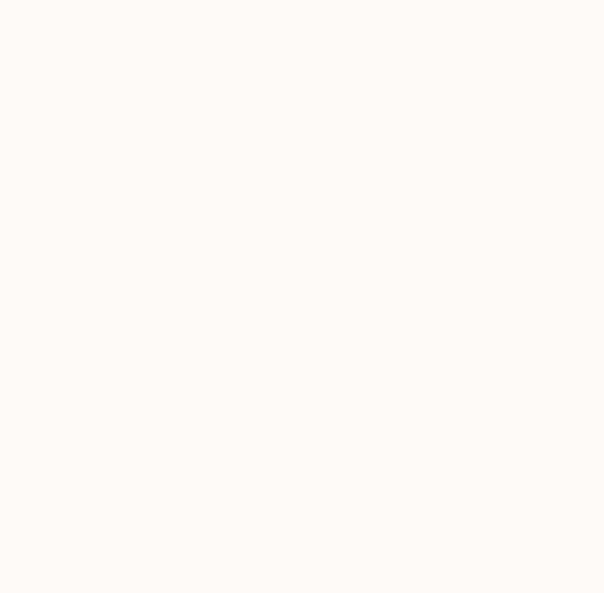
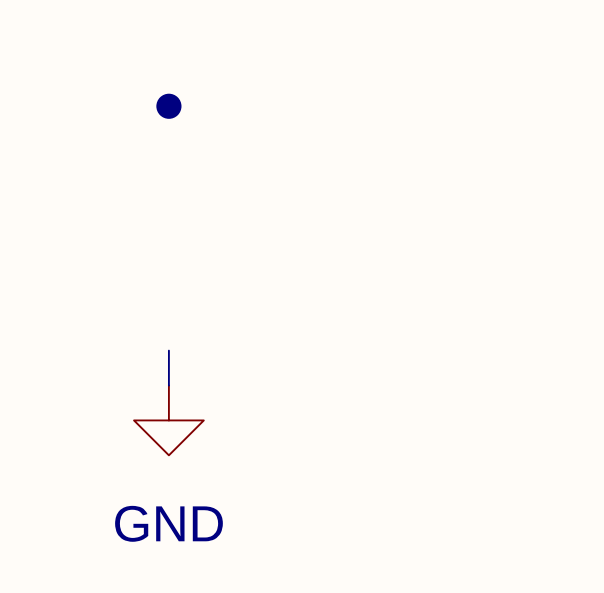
junction: none -> (168, 106)
wire: none -> (168, 350) (168, 385)
power symbol: none -> GND (168, 420)

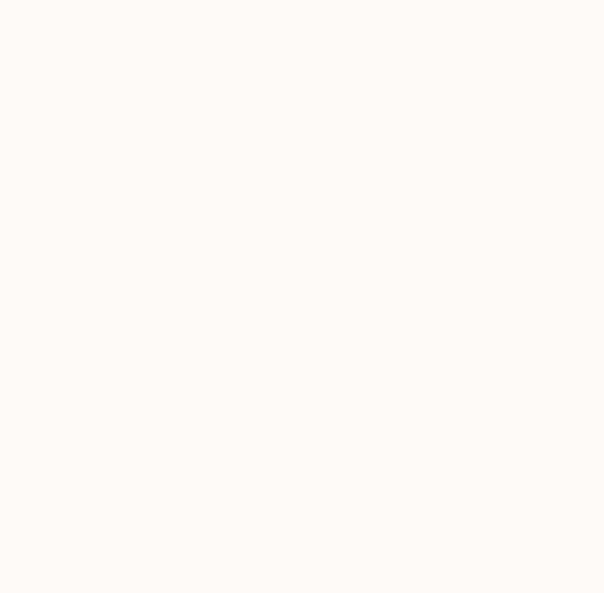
junction: (168, 106) -> none
wire: (168, 350) (168, 385) -> none
power symbol: GND (168, 420) -> none

